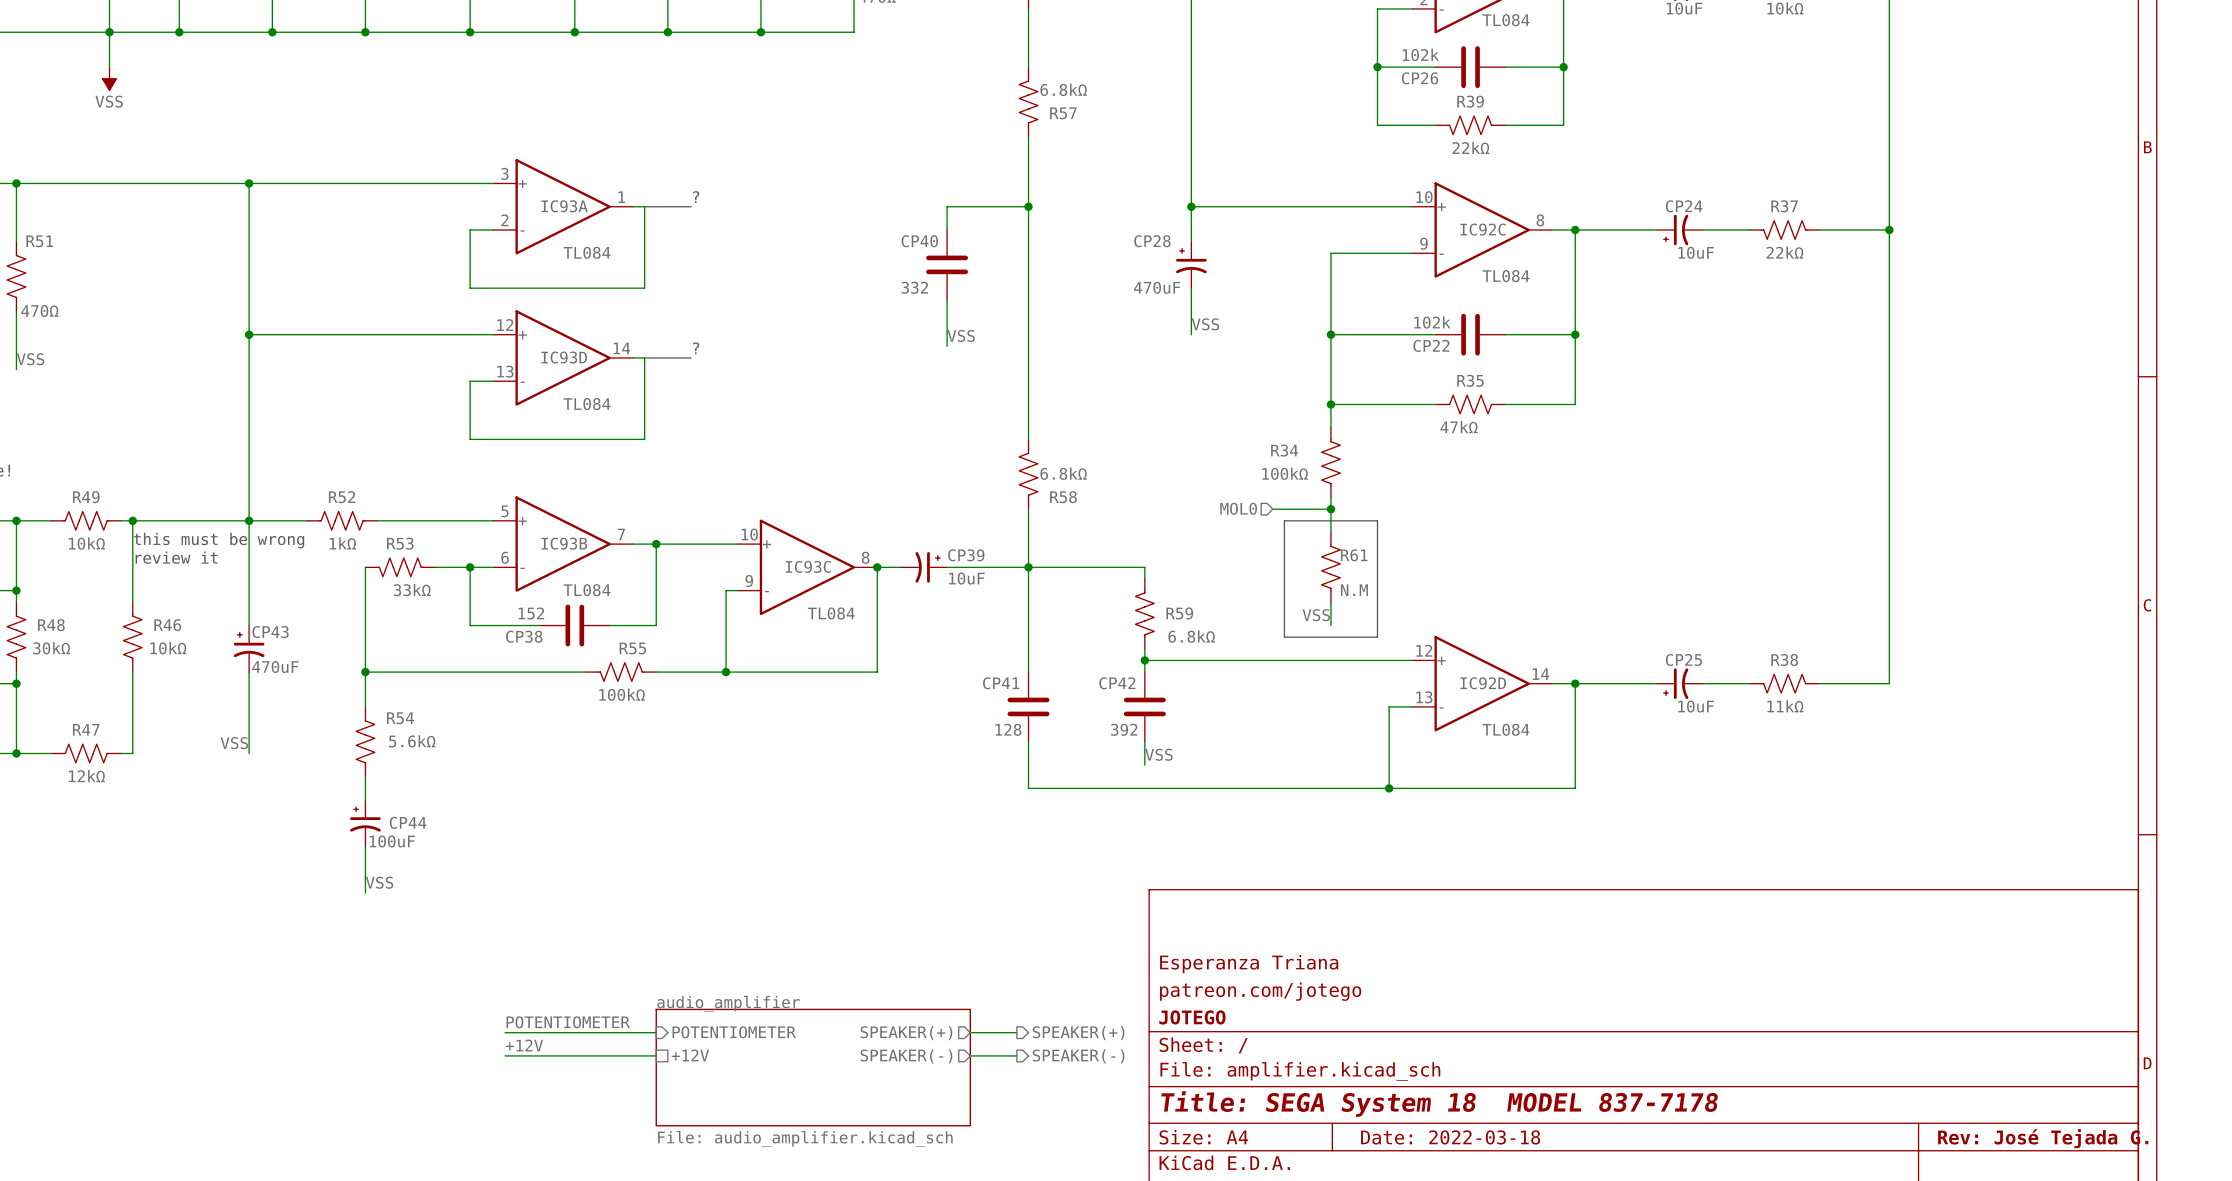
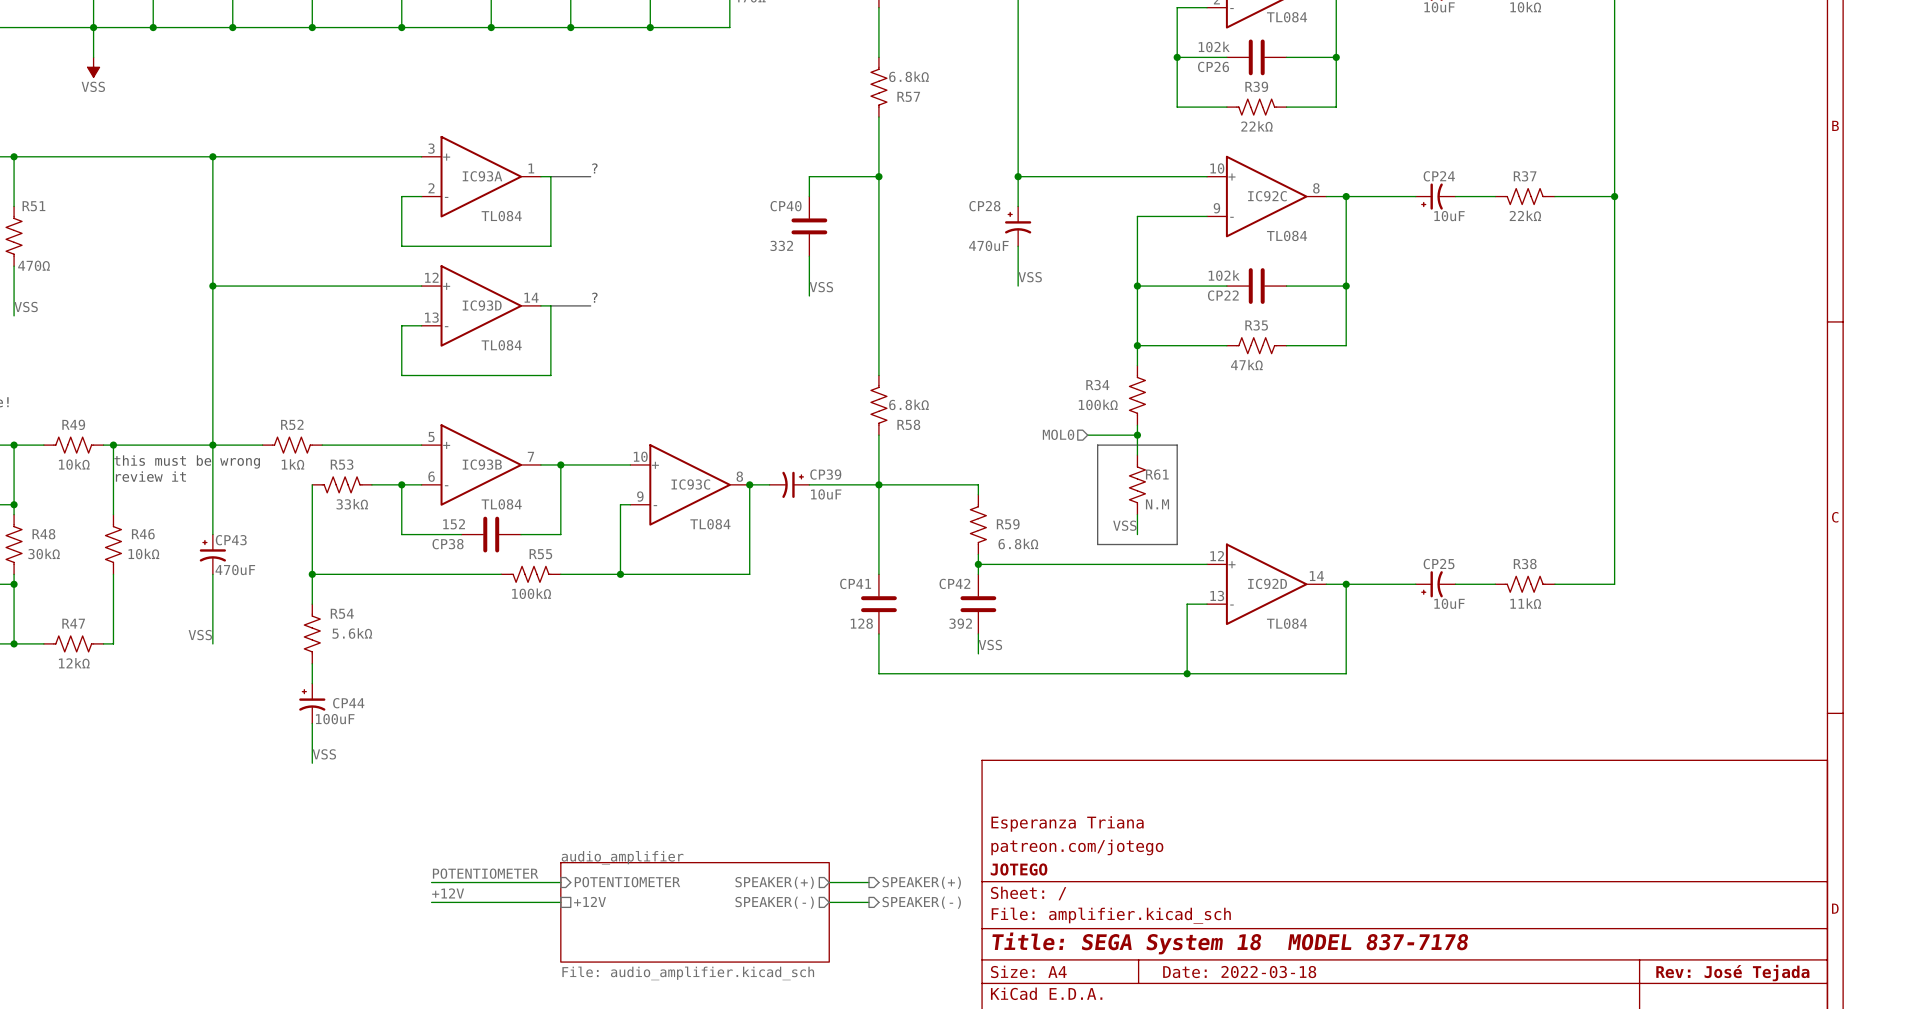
title block: Rev: José Tejada G. (2043, 1138) -> Rev: José Tejada (1732, 973)

